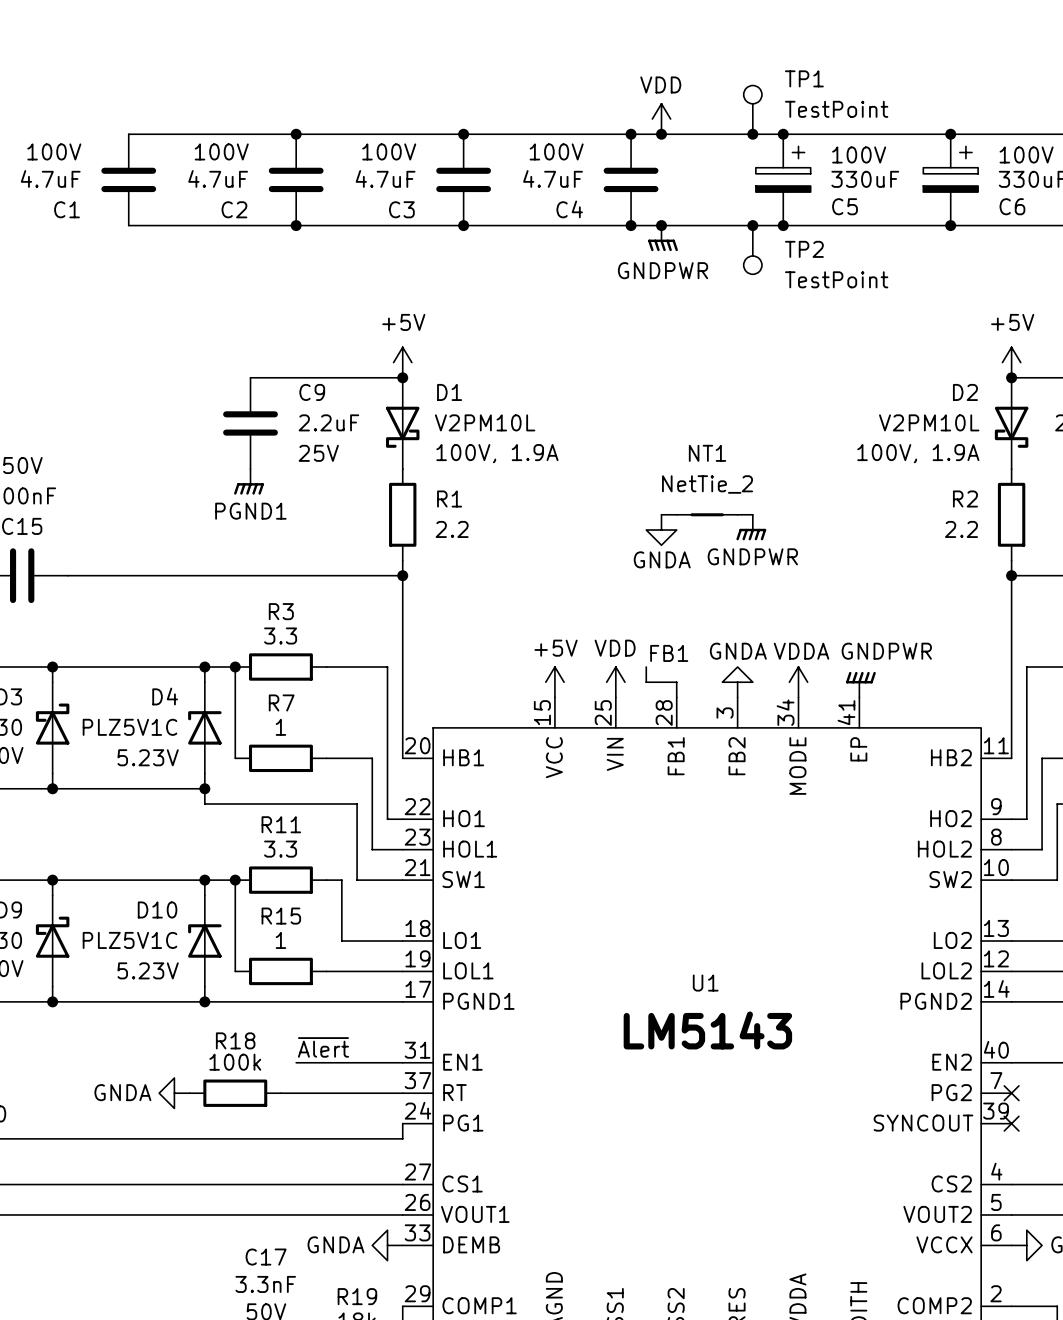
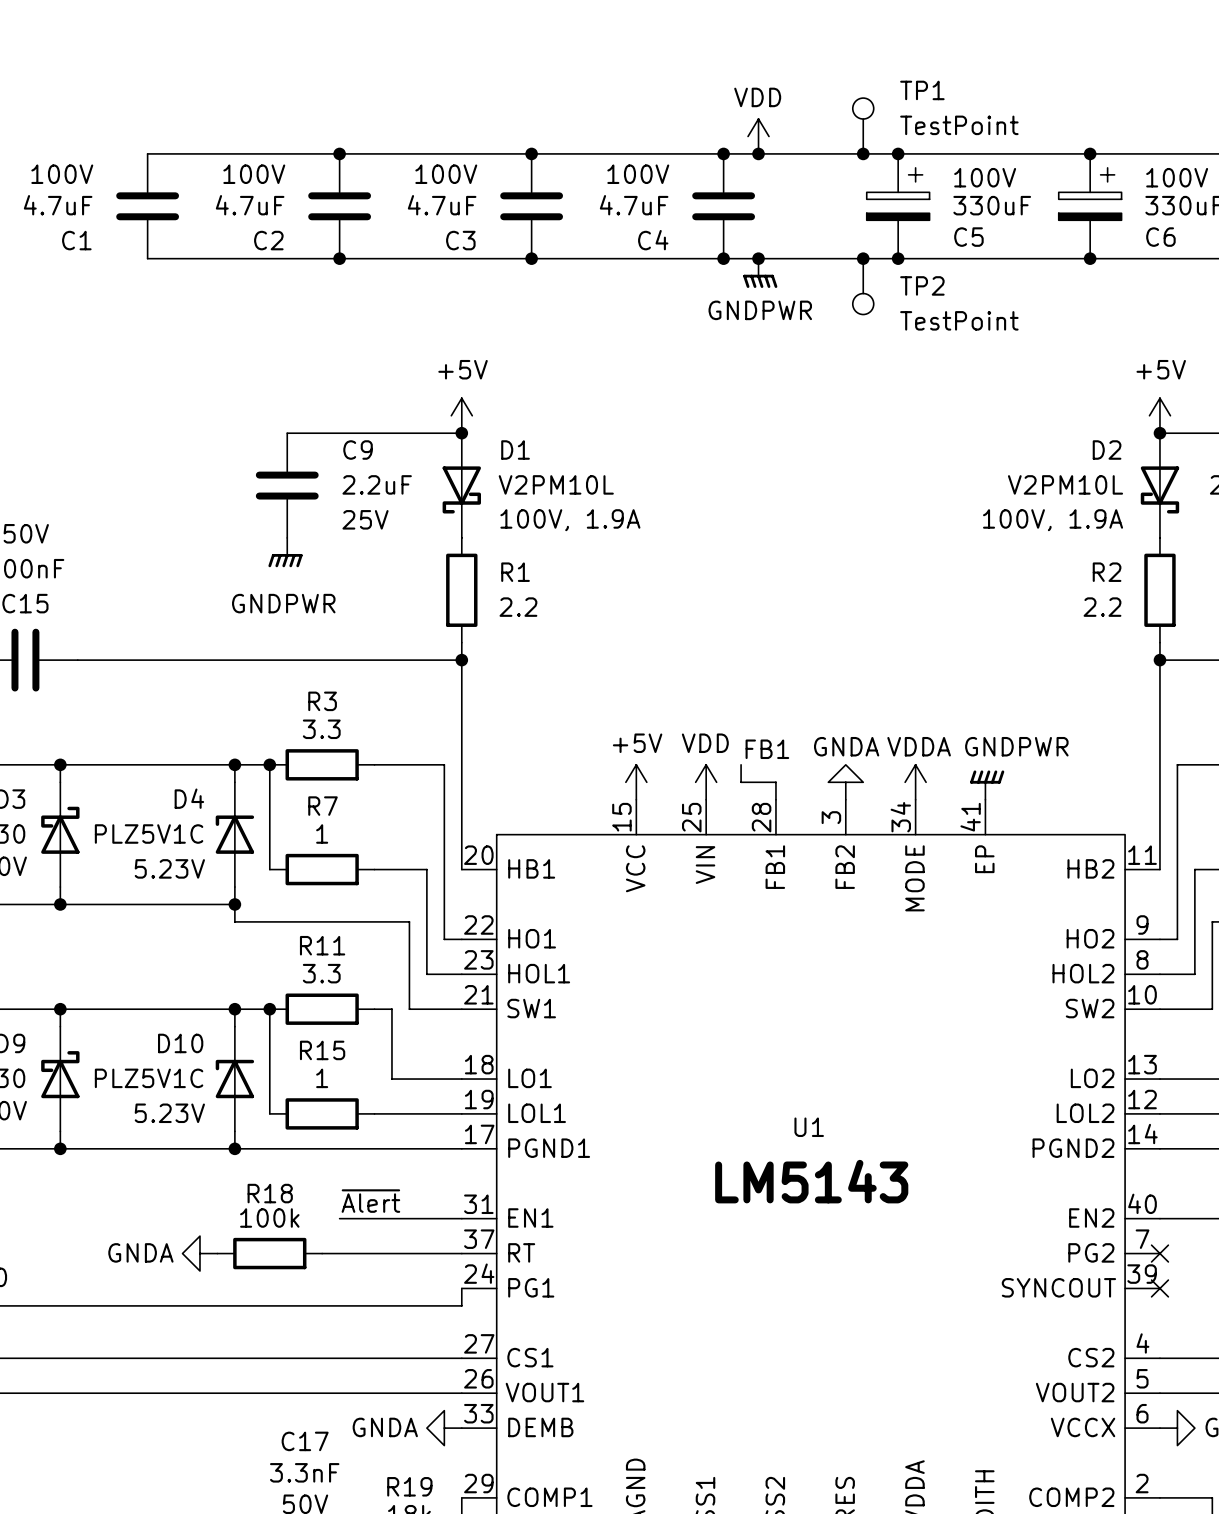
power symbol: PGND1 (248, 481) -> GNDPWR (285, 552)
wire: (661, 514) (676, 514) -> none
NT1: NetTie_2 (707, 514) -> none
wire: (737, 514) (752, 514) -> none
power symbol: GNDPWR (751, 527) -> none
power symbol: GNDA (661, 530) -> none

